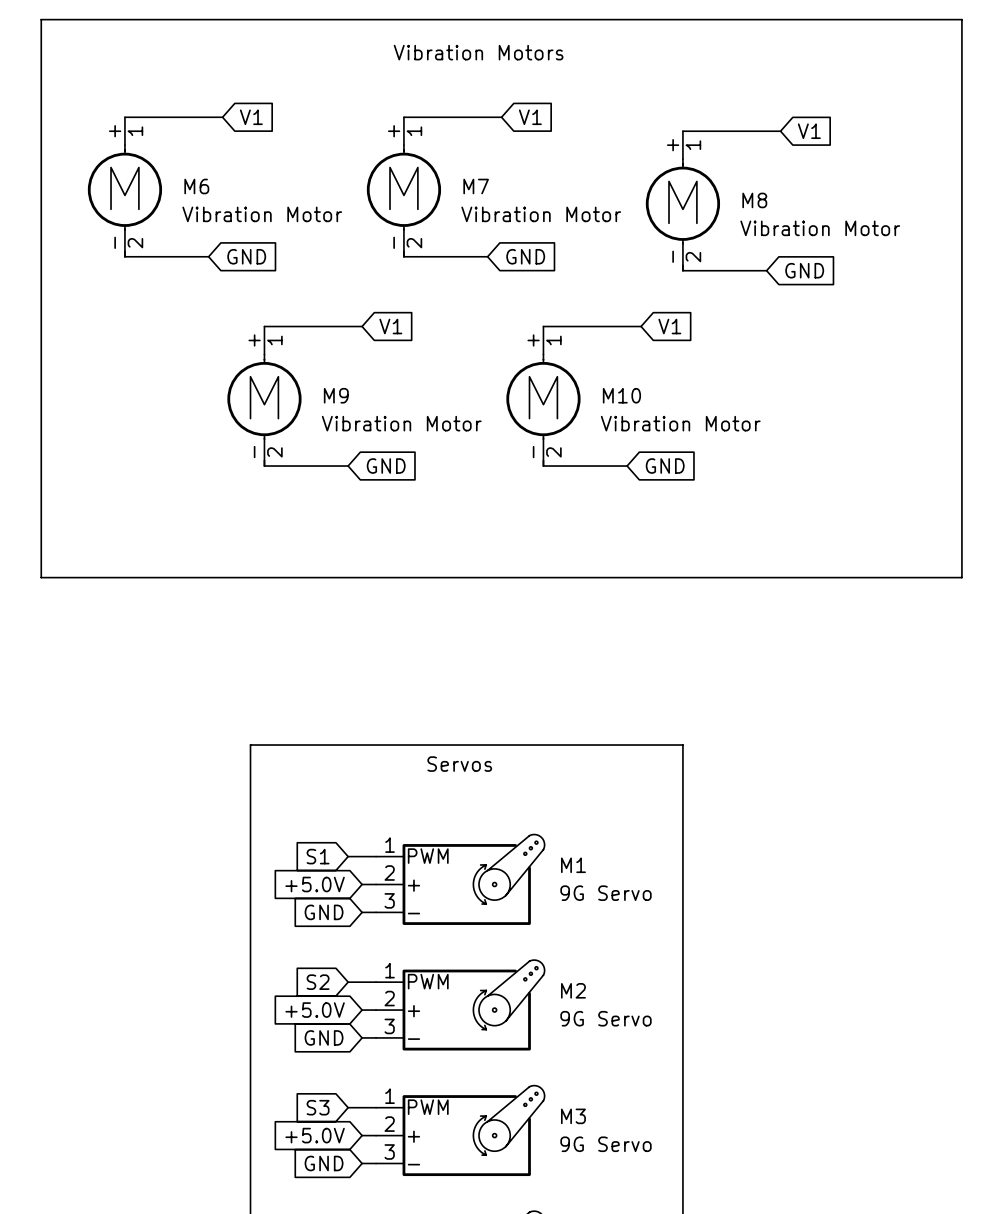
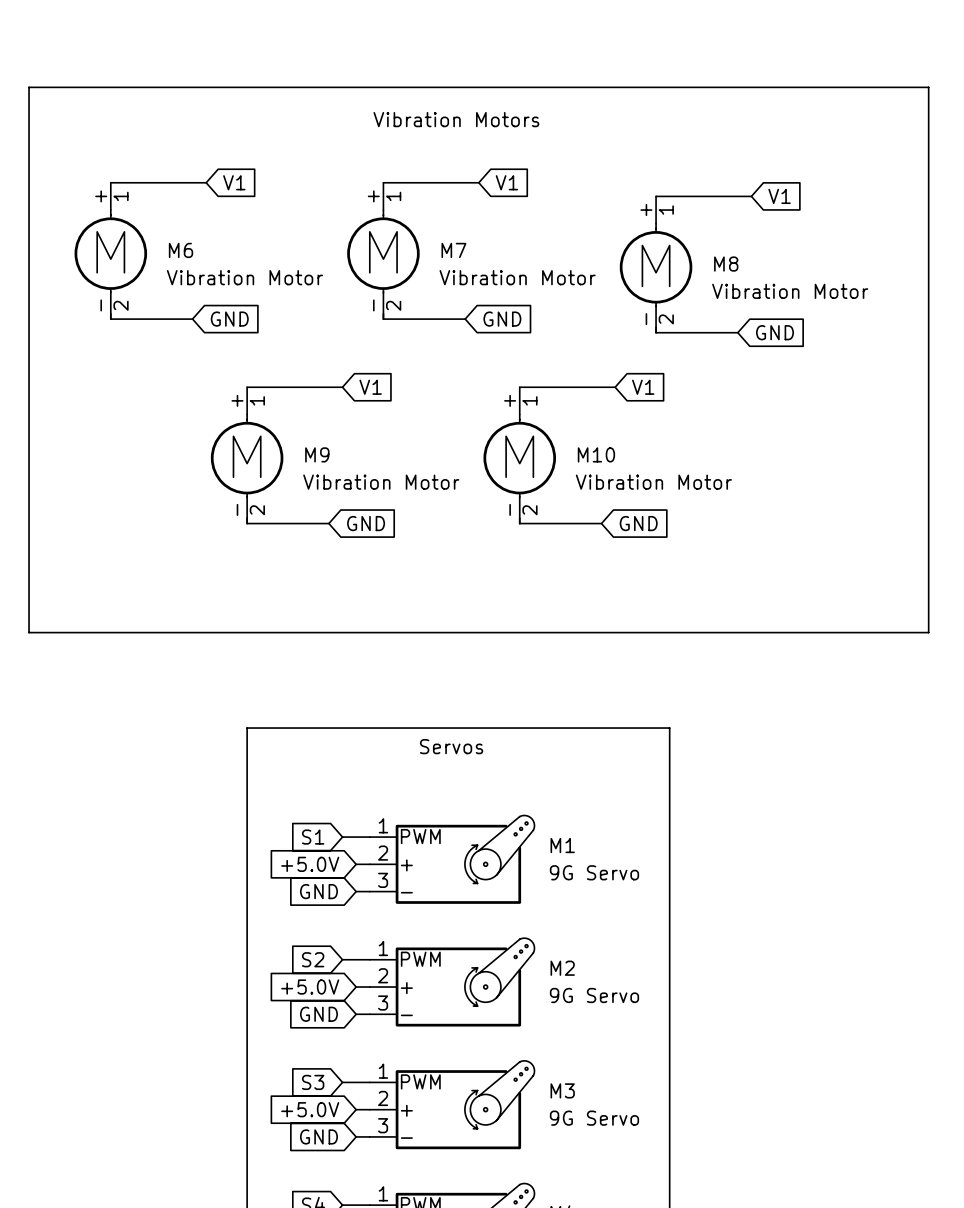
line: (41, 19) (961, 19) (961, 577) (41, 577) (41, 19) -> (29, 87) (928, 87) (928, 632) (29, 632) (29, 87)
text position: Vibration Motors (478, 52) -> Vibration Motors (456, 119)
wire: (124, 117) (222, 117) -> (110, 182) (206, 182)
global label position: V1 (251, 117) -> V1 (234, 182)
wire: (403, 117) (501, 117) -> (383, 182) (478, 182)
global label position: V1 (530, 117) -> V1 (506, 182)
wire: (682, 131) (780, 131) -> (656, 196) (751, 196)
global label position: V1 (809, 131) -> V1 (779, 196)
M6 position: (124, 187) -> (110, 250)
M7 position: (403, 187) -> (383, 250)
M8 position: (682, 200) -> (656, 264)
wire: (124, 256) (208, 256) -> (110, 319) (192, 319)
global label position: GND (246, 256) -> GND (229, 319)
wire: (403, 256) (487, 256) -> (383, 319) (465, 319)
global label position: GND (525, 256) -> GND (502, 319)
wire: (682, 270) (766, 270) -> (656, 332) (737, 332)
global label position: GND (804, 270) -> GND (775, 332)
wire: (264, 326) (362, 326) -> (247, 387) (342, 387)
global label position: V1 (390, 326) -> V1 (370, 387)
wire: (543, 326) (641, 326) -> (519, 387) (615, 387)
global label position: V1 (669, 326) -> V1 (643, 387)
M9 position: (264, 396) -> (247, 455)
M10 position: (543, 396) -> (519, 455)
wire: (264, 466) (348, 466) -> (247, 523) (328, 523)
global label position: GND (386, 466) -> GND (366, 523)
wire: (543, 466) (627, 466) -> (519, 523) (601, 523)
global label position: GND (665, 466) -> GND (638, 523)

